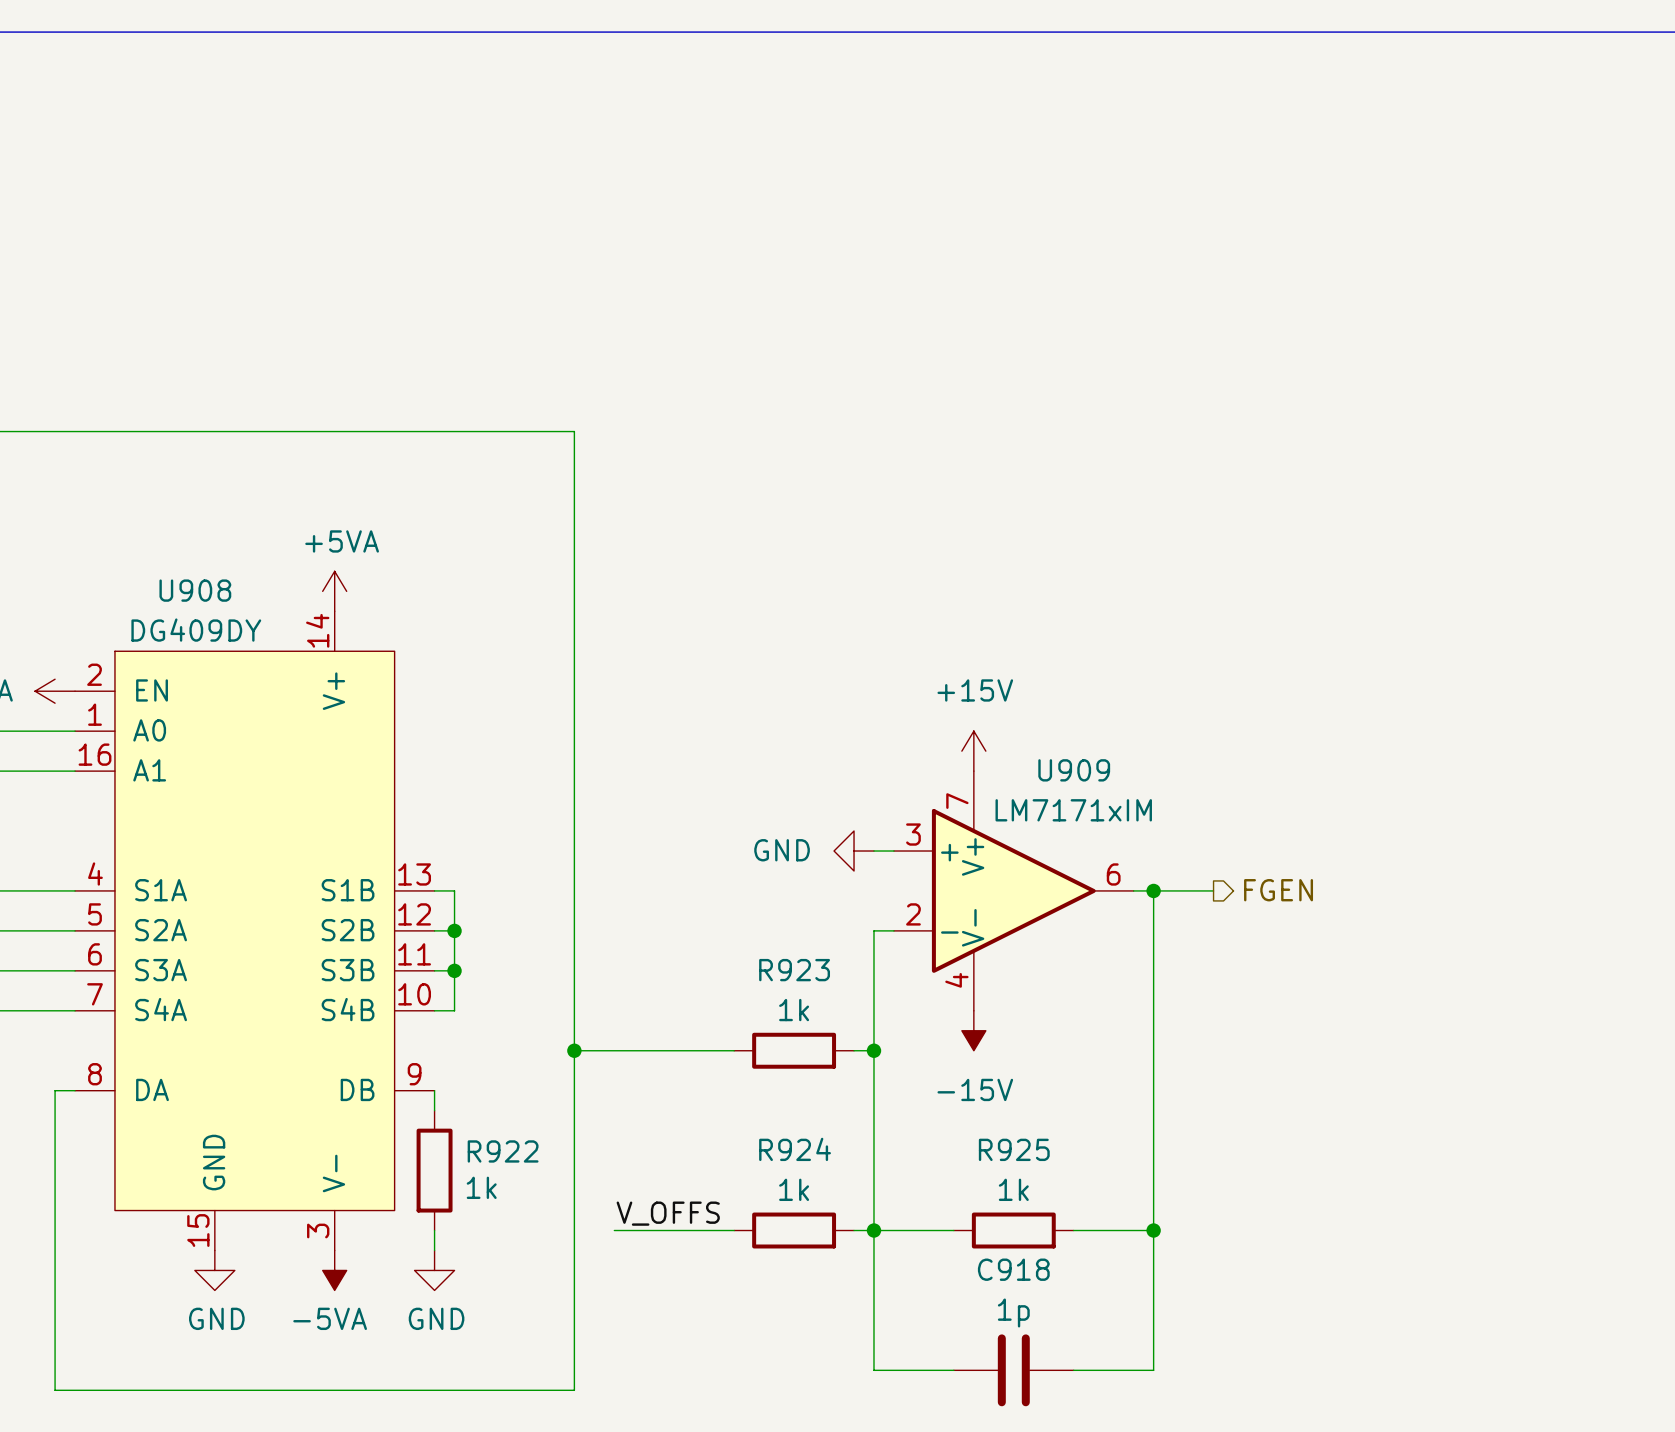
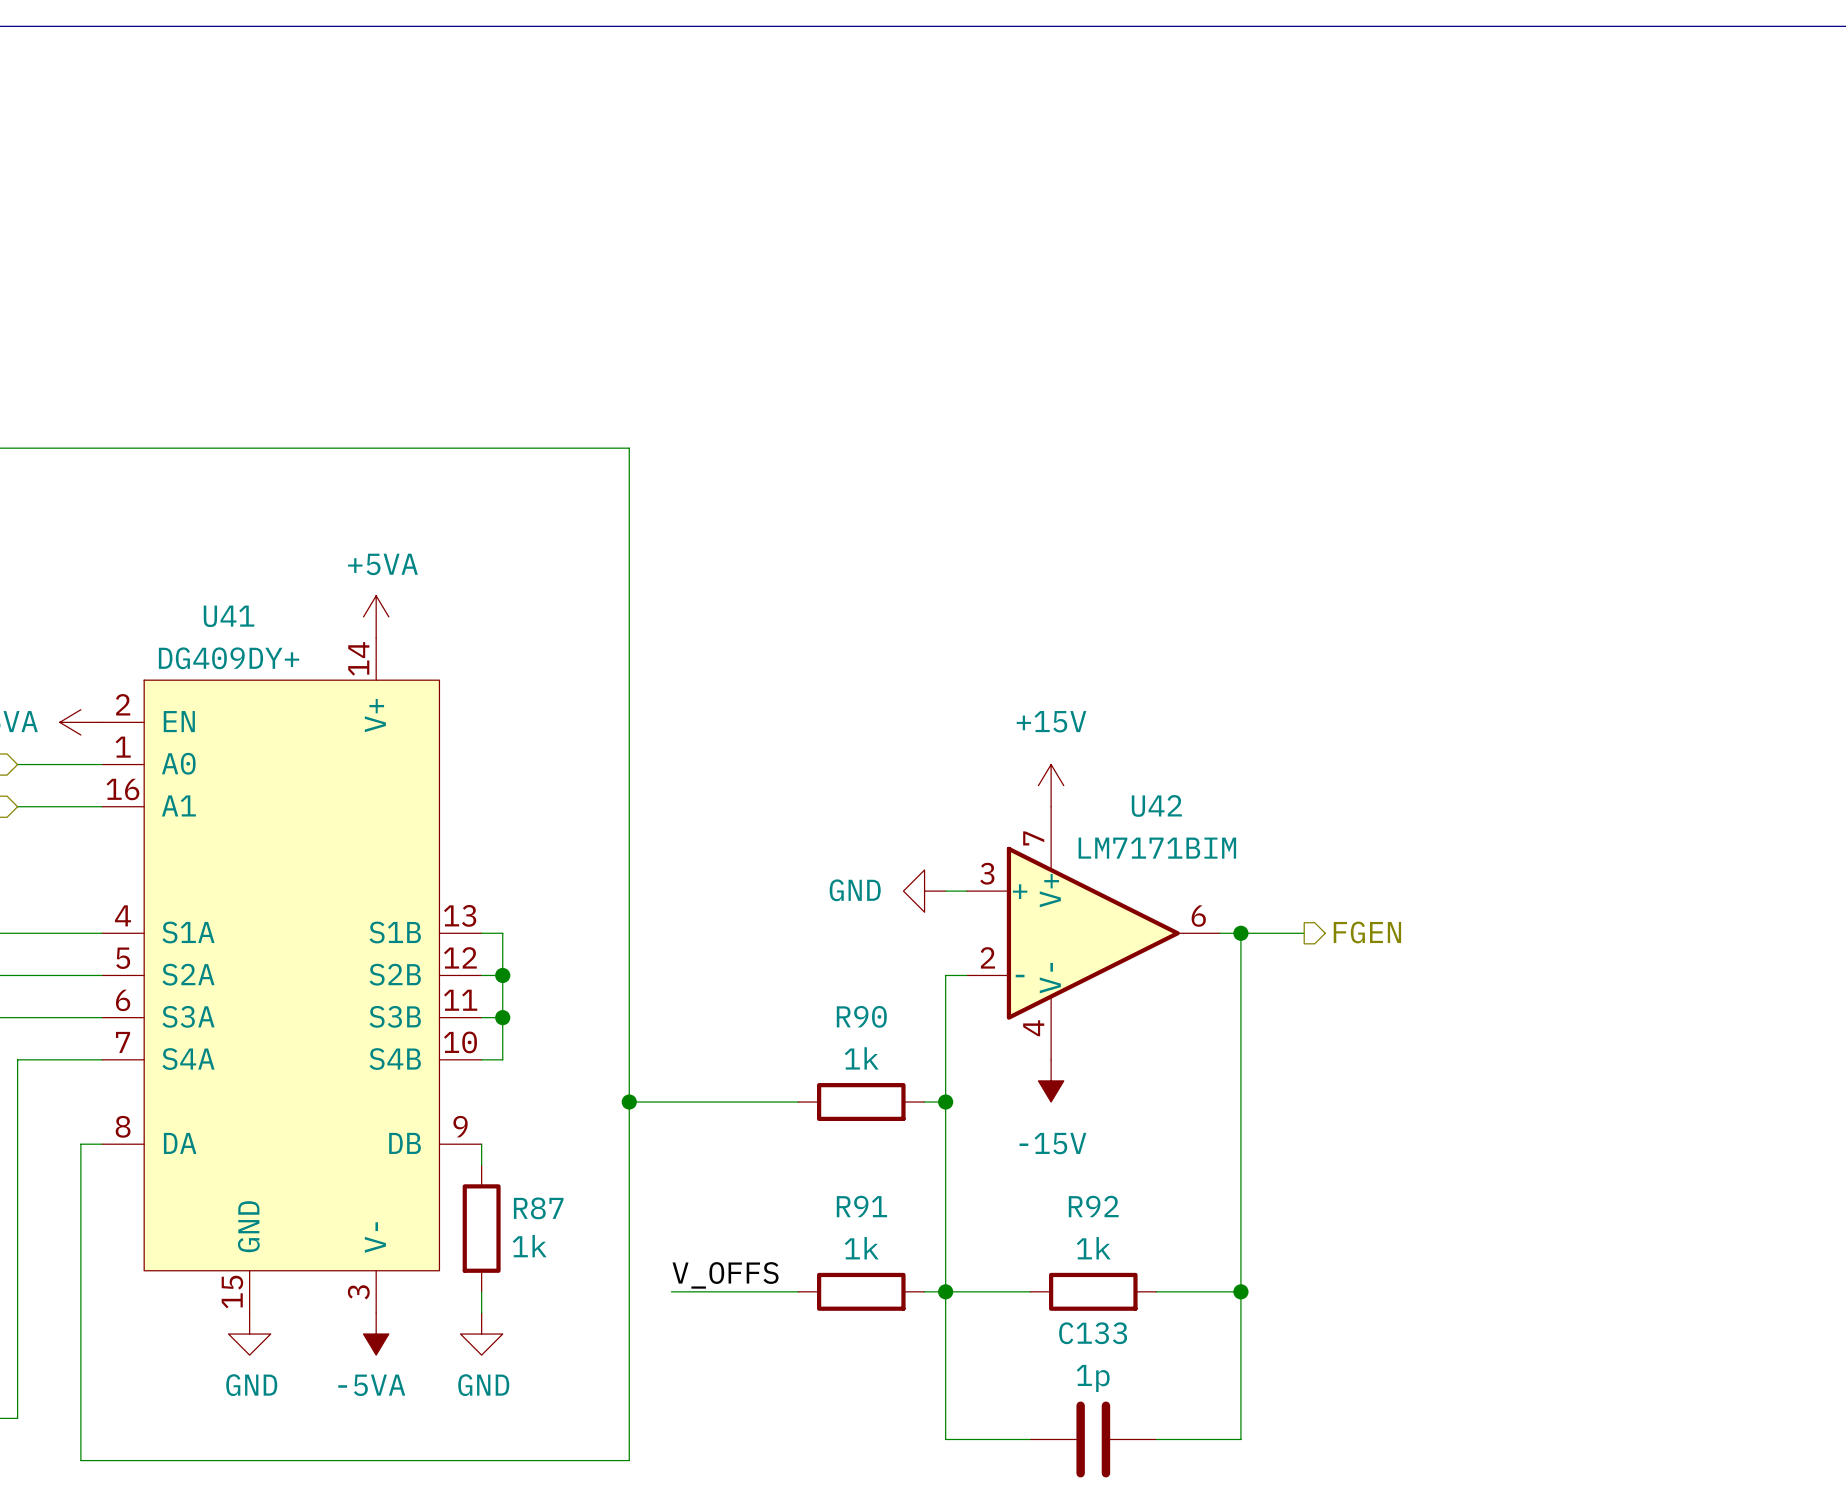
U908 name: U908 (195, 590) -> U41 (229, 616)
U908 value: DG409DY (196, 630) -> DG409DY+ (229, 658)
U909 name: U909 (1074, 770) -> U42 (1156, 805)
U909 value: LM7171xIM (1073, 810) -> LM7171BIM (1157, 848)
R923 name: R923 (794, 970) -> R90 (861, 1016)
R924 name: R924 (795, 1149) -> R91 (861, 1206)
R925 name: R925 (1014, 1149) -> R92 (1093, 1206)
R922 name: R922 (503, 1151) -> R87 (538, 1208)
C918 name: C918 (1013, 1269) -> C133 (1093, 1333)

